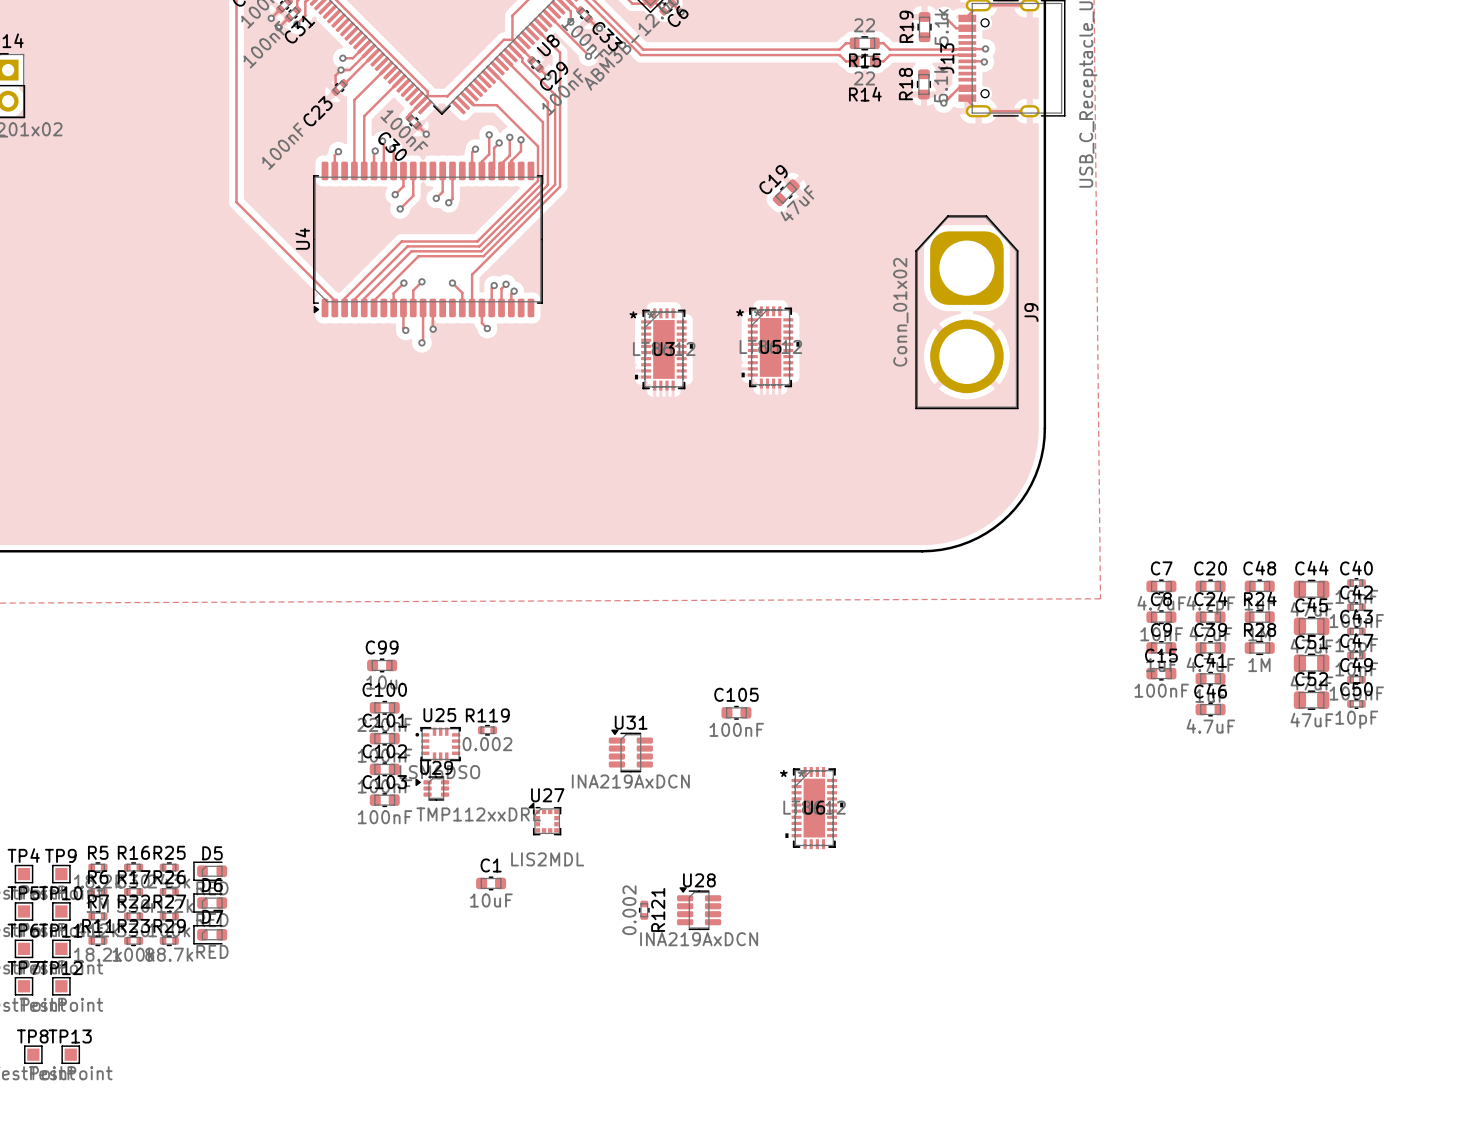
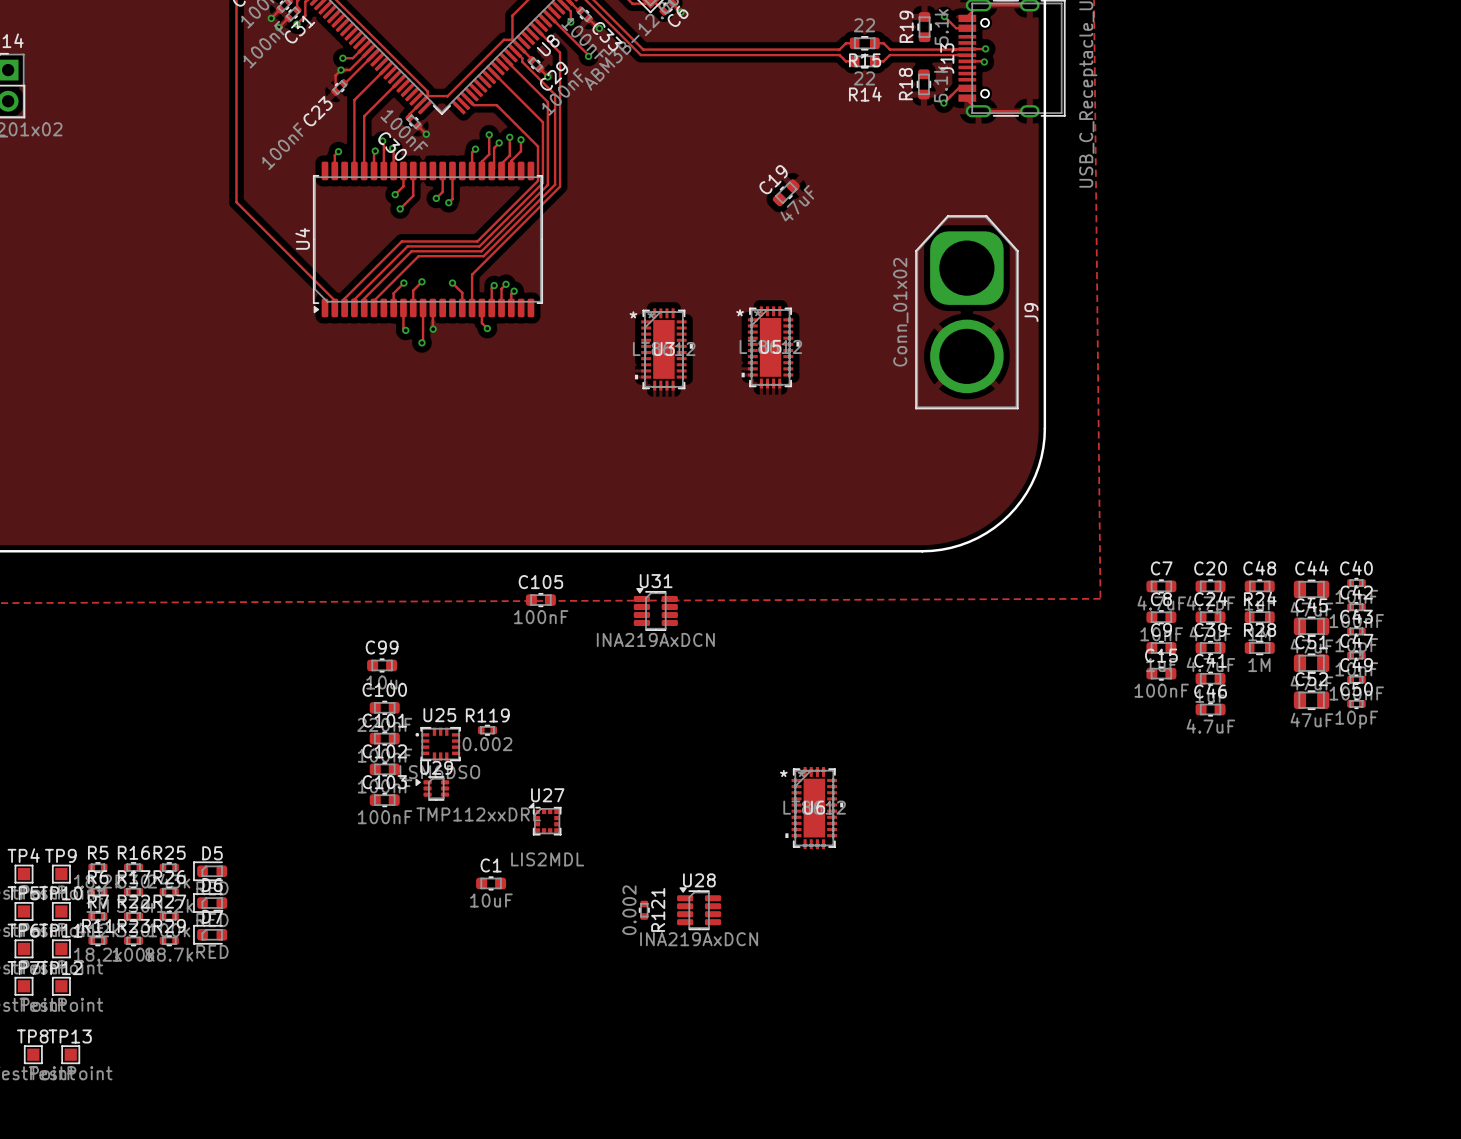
C105 position: (736, 712) -> (540, 600)
U31 position: (630, 750) -> (655, 609)

